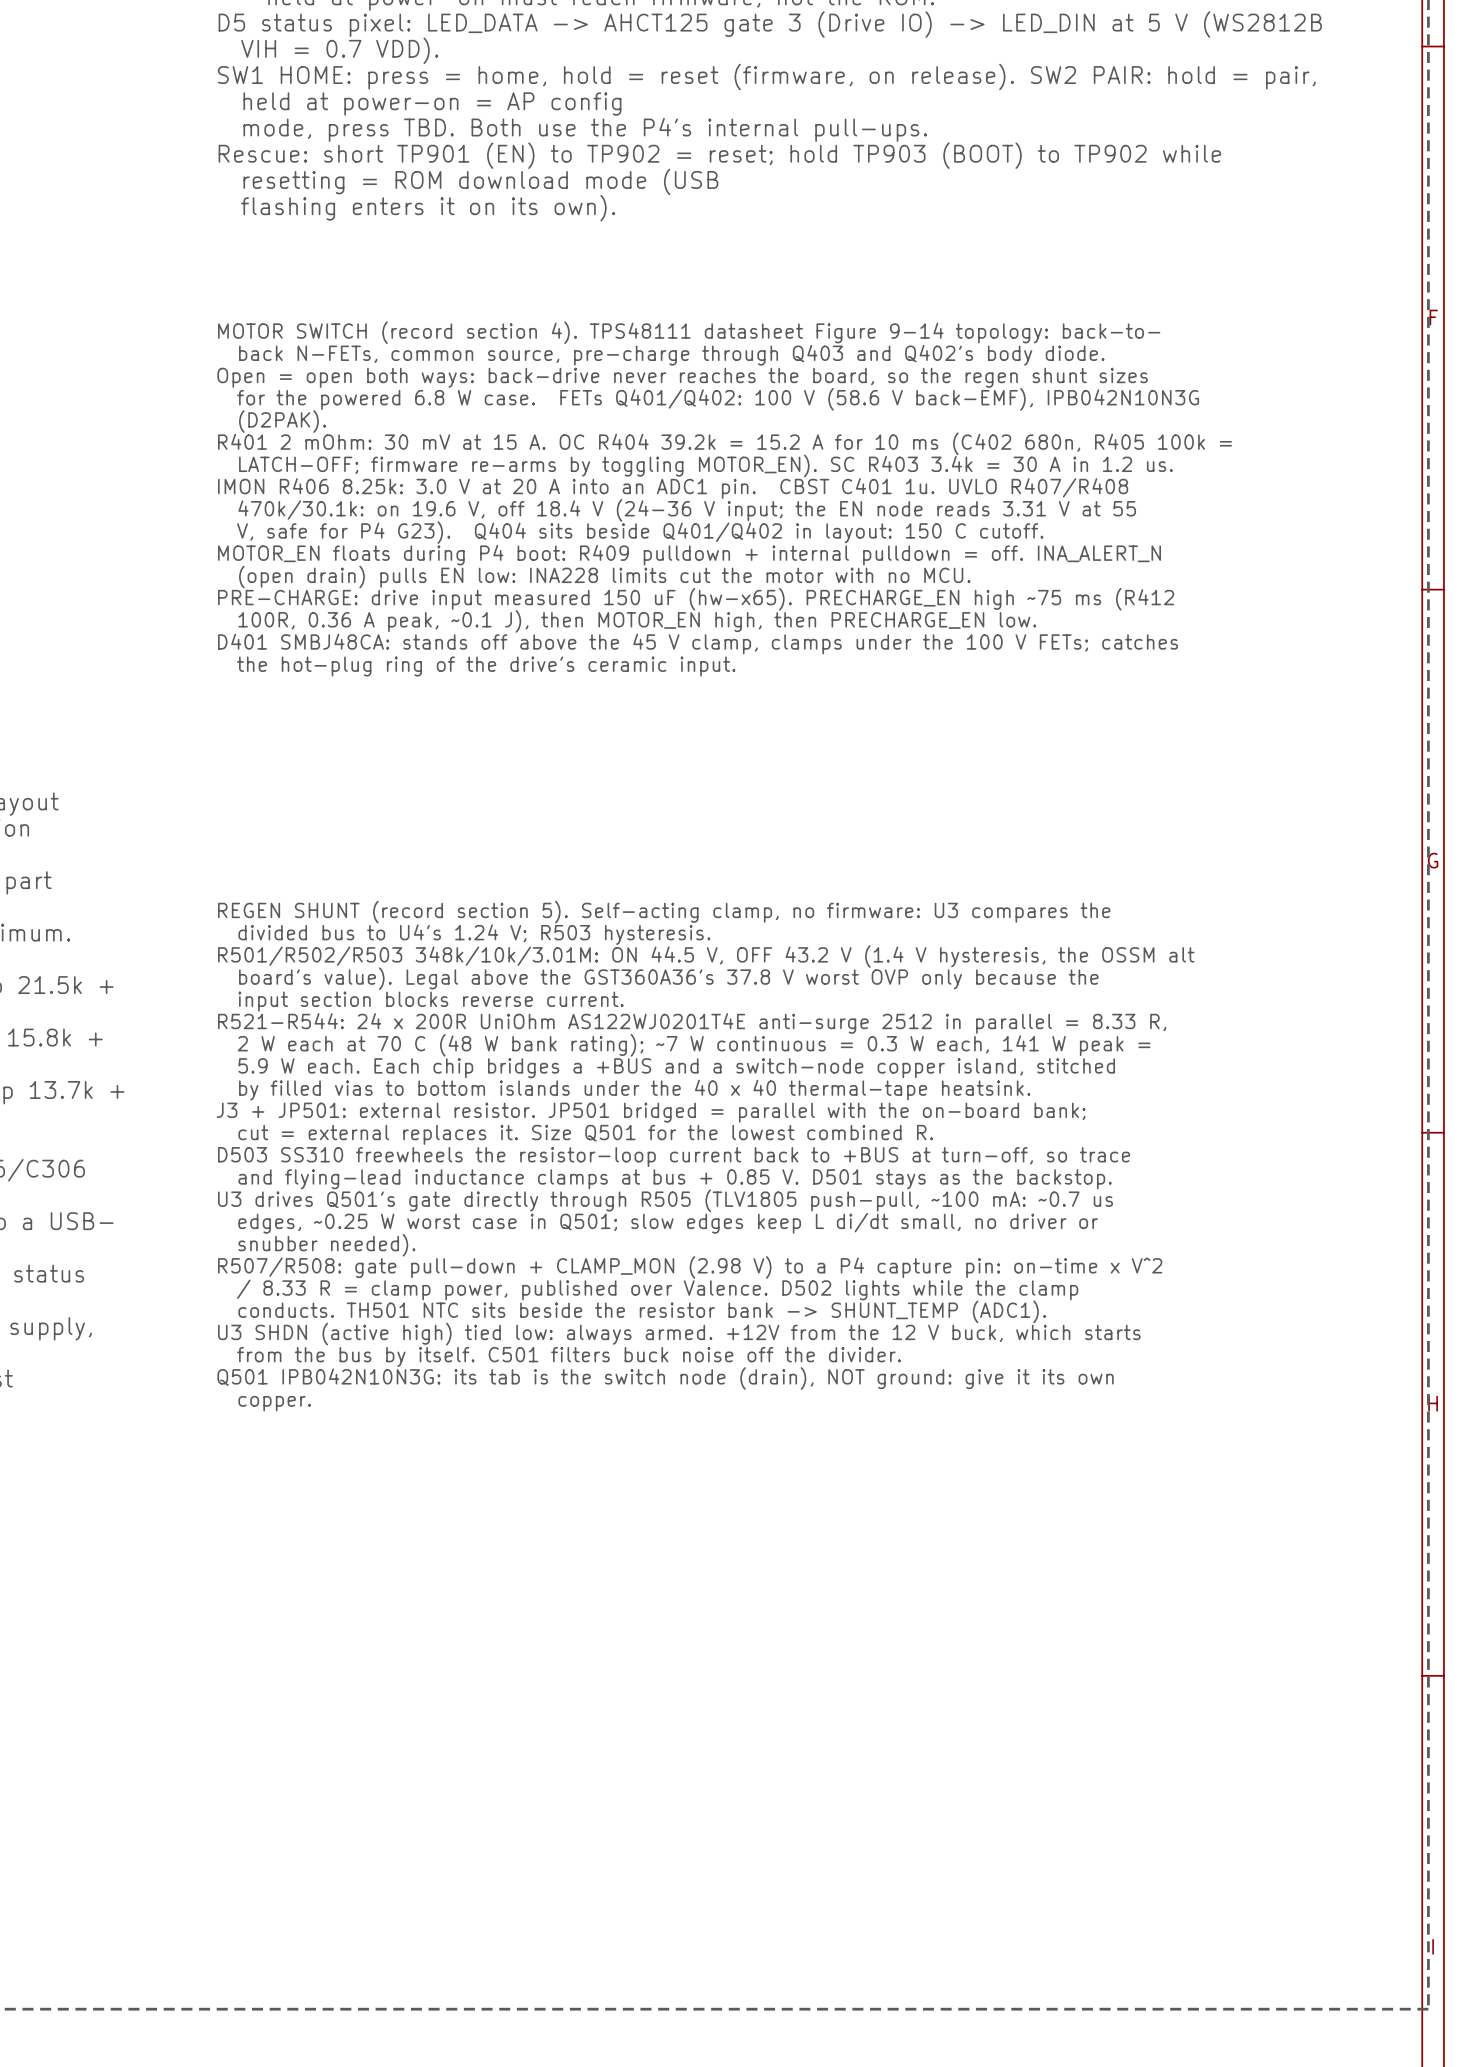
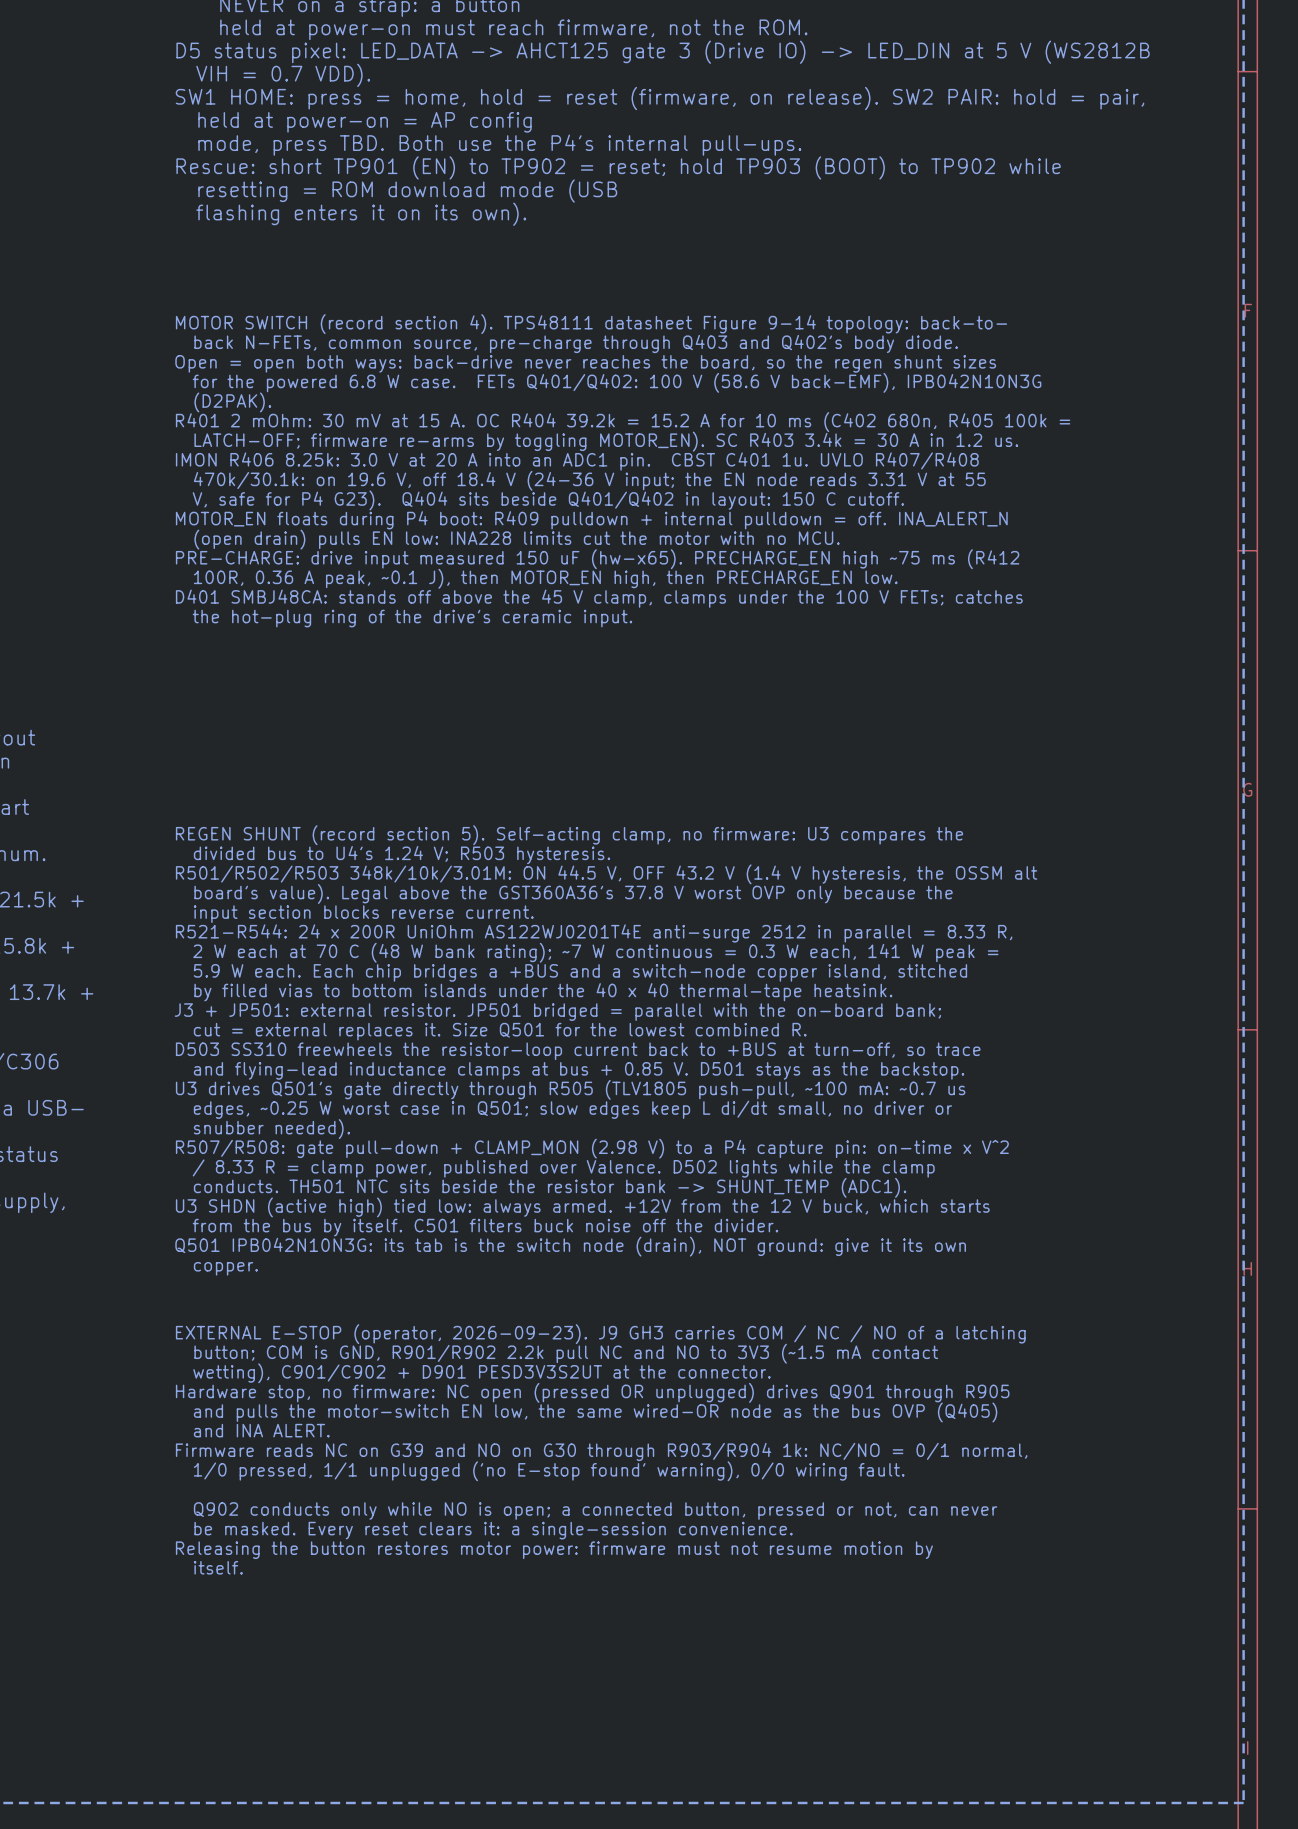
text: none -> EXTERNAL E-STOP (operator, 2026-09-23). J9 GH3 carries COM / NC / NO of a latching (600, 1334)
text: none -> button; COM is GND, R901/R902 2.2k pull NC and NO to 3V3 (~1.5 mA contact (566, 1353)
text: none -> wetting), C901/C902 + D901 PESD3V3S2UT at the connector. (481, 1373)
text: none -> Hardware stop, no firmware: NC open (pressed OR unplugged) drives Q901 through R905 (592, 1392)
text: none -> and pulls the motor-switch EN low, the same wired-OR node as the bus OVP (Q405) (595, 1412)
text: none -> and INA ALERT. (261, 1430)
text: none -> Firmware reads NC on G39 and NO on G30 through R903/R904 1k: NC/NO = 0/1 normal, (601, 1451)
text: none -> 1/0 pressed, 1/1 unplugged ('no E-stop found' warning), 0/0 wiring fault. (549, 1471)
text: none -> Q902 conducts only while NO is open; a connected button, pressed or not, can never (595, 1511)
text: none -> be masked. Every reset clears it: a single-session convenience. (493, 1530)
text: none -> Releasing the button restores motor power: firmware must not resume motion by (554, 1550)
text: none -> itself. (218, 1567)

